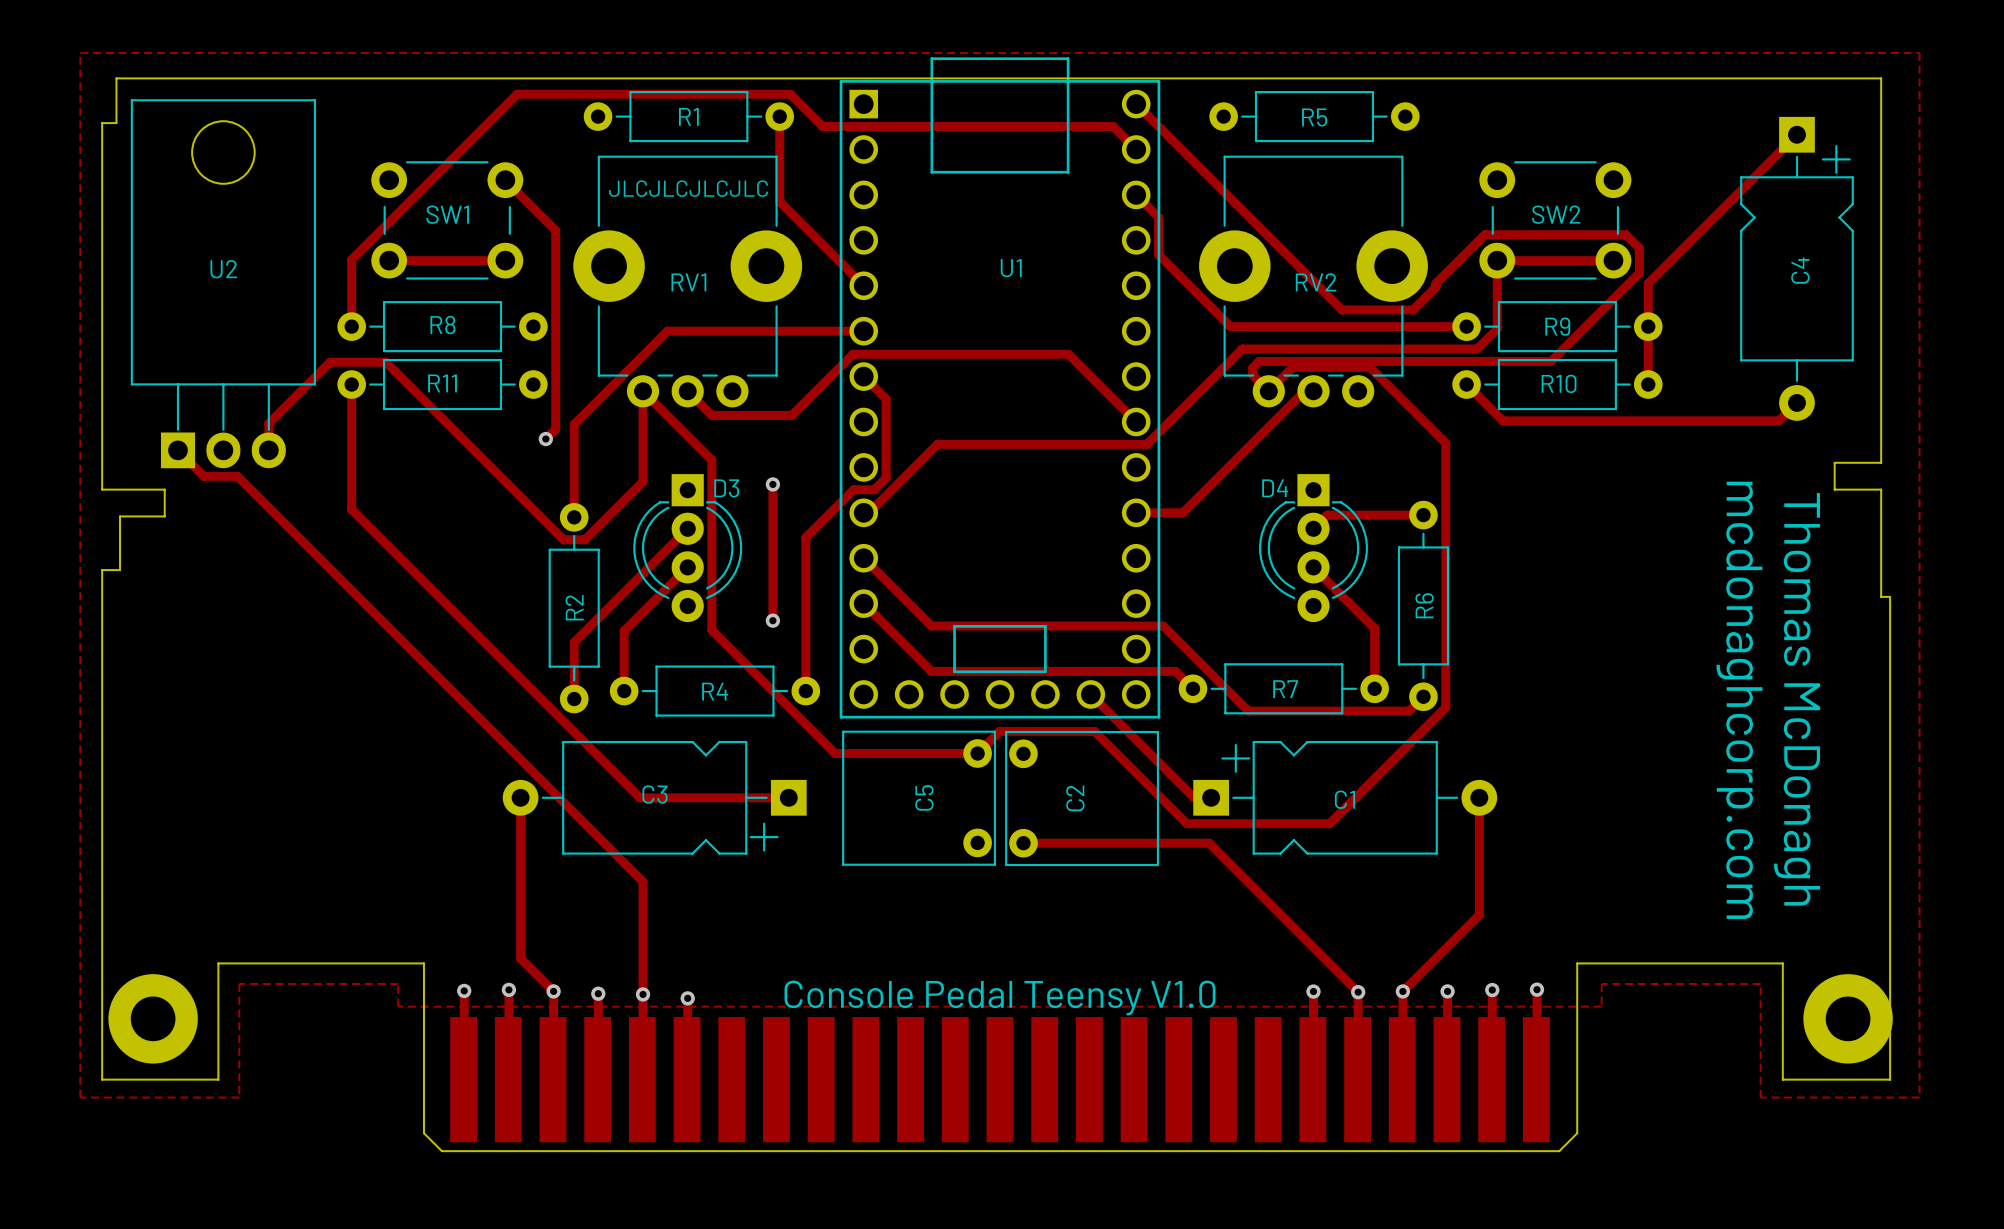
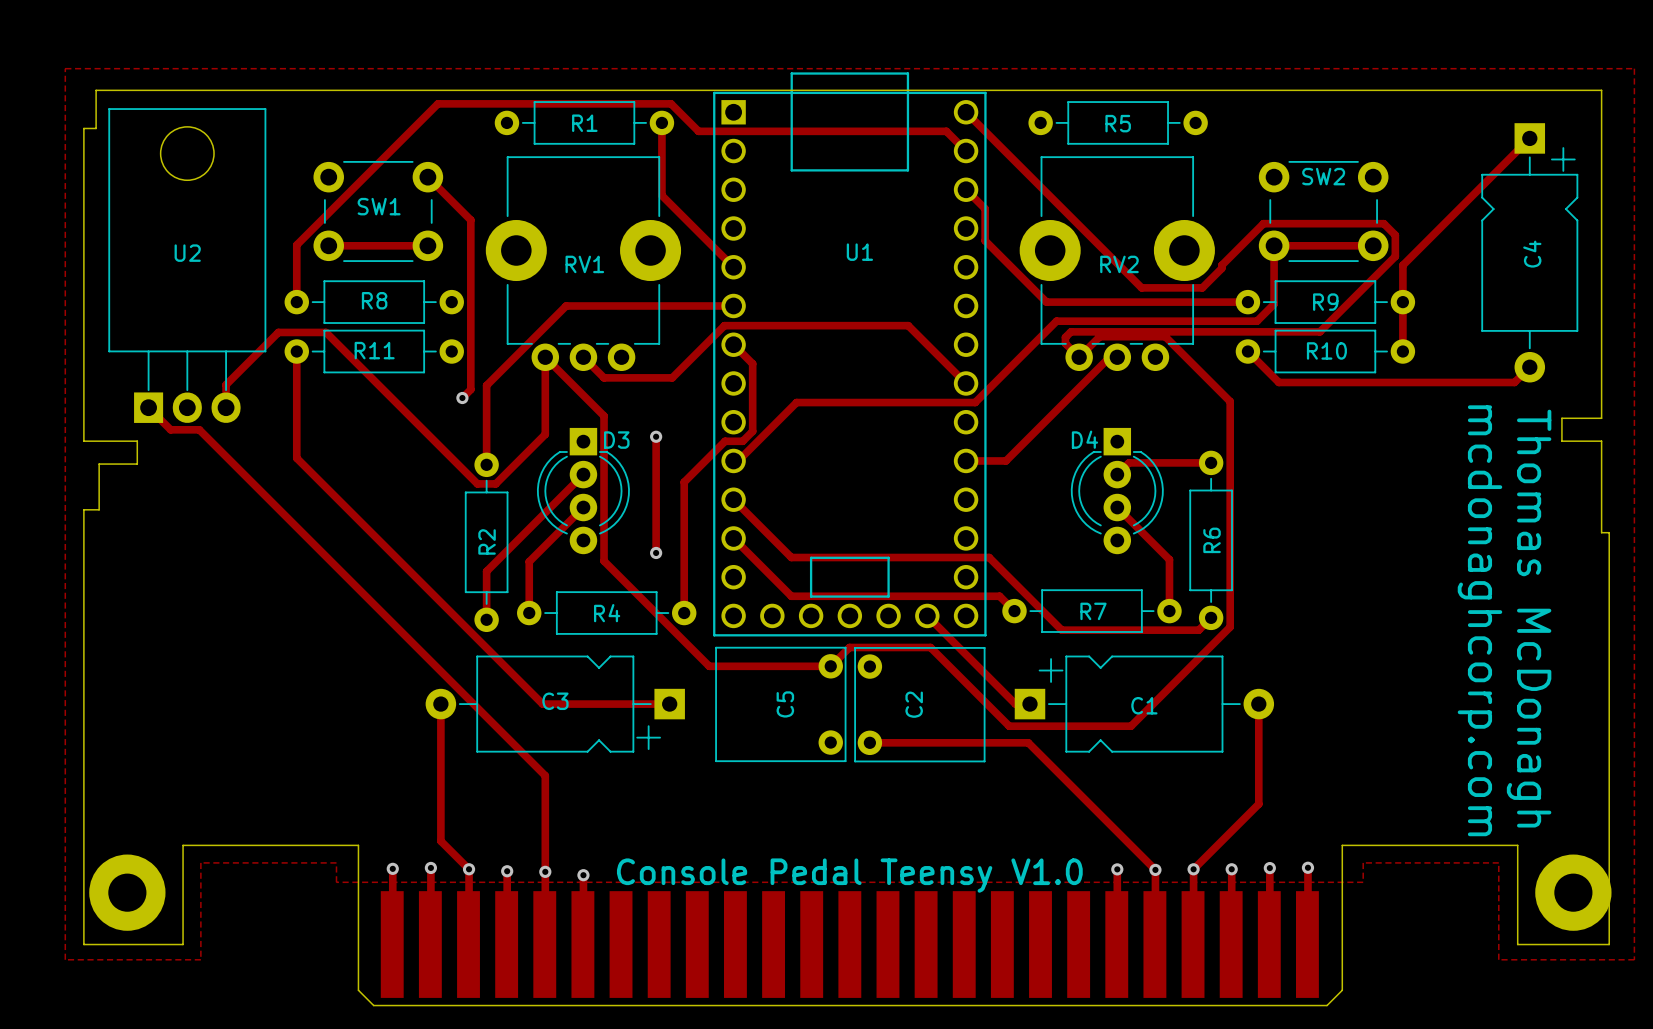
text: JLCJLCJLCJLC (688, 188) -> none
SW2 name position: SW2 (1556, 214) -> SW2 (1323, 176)

